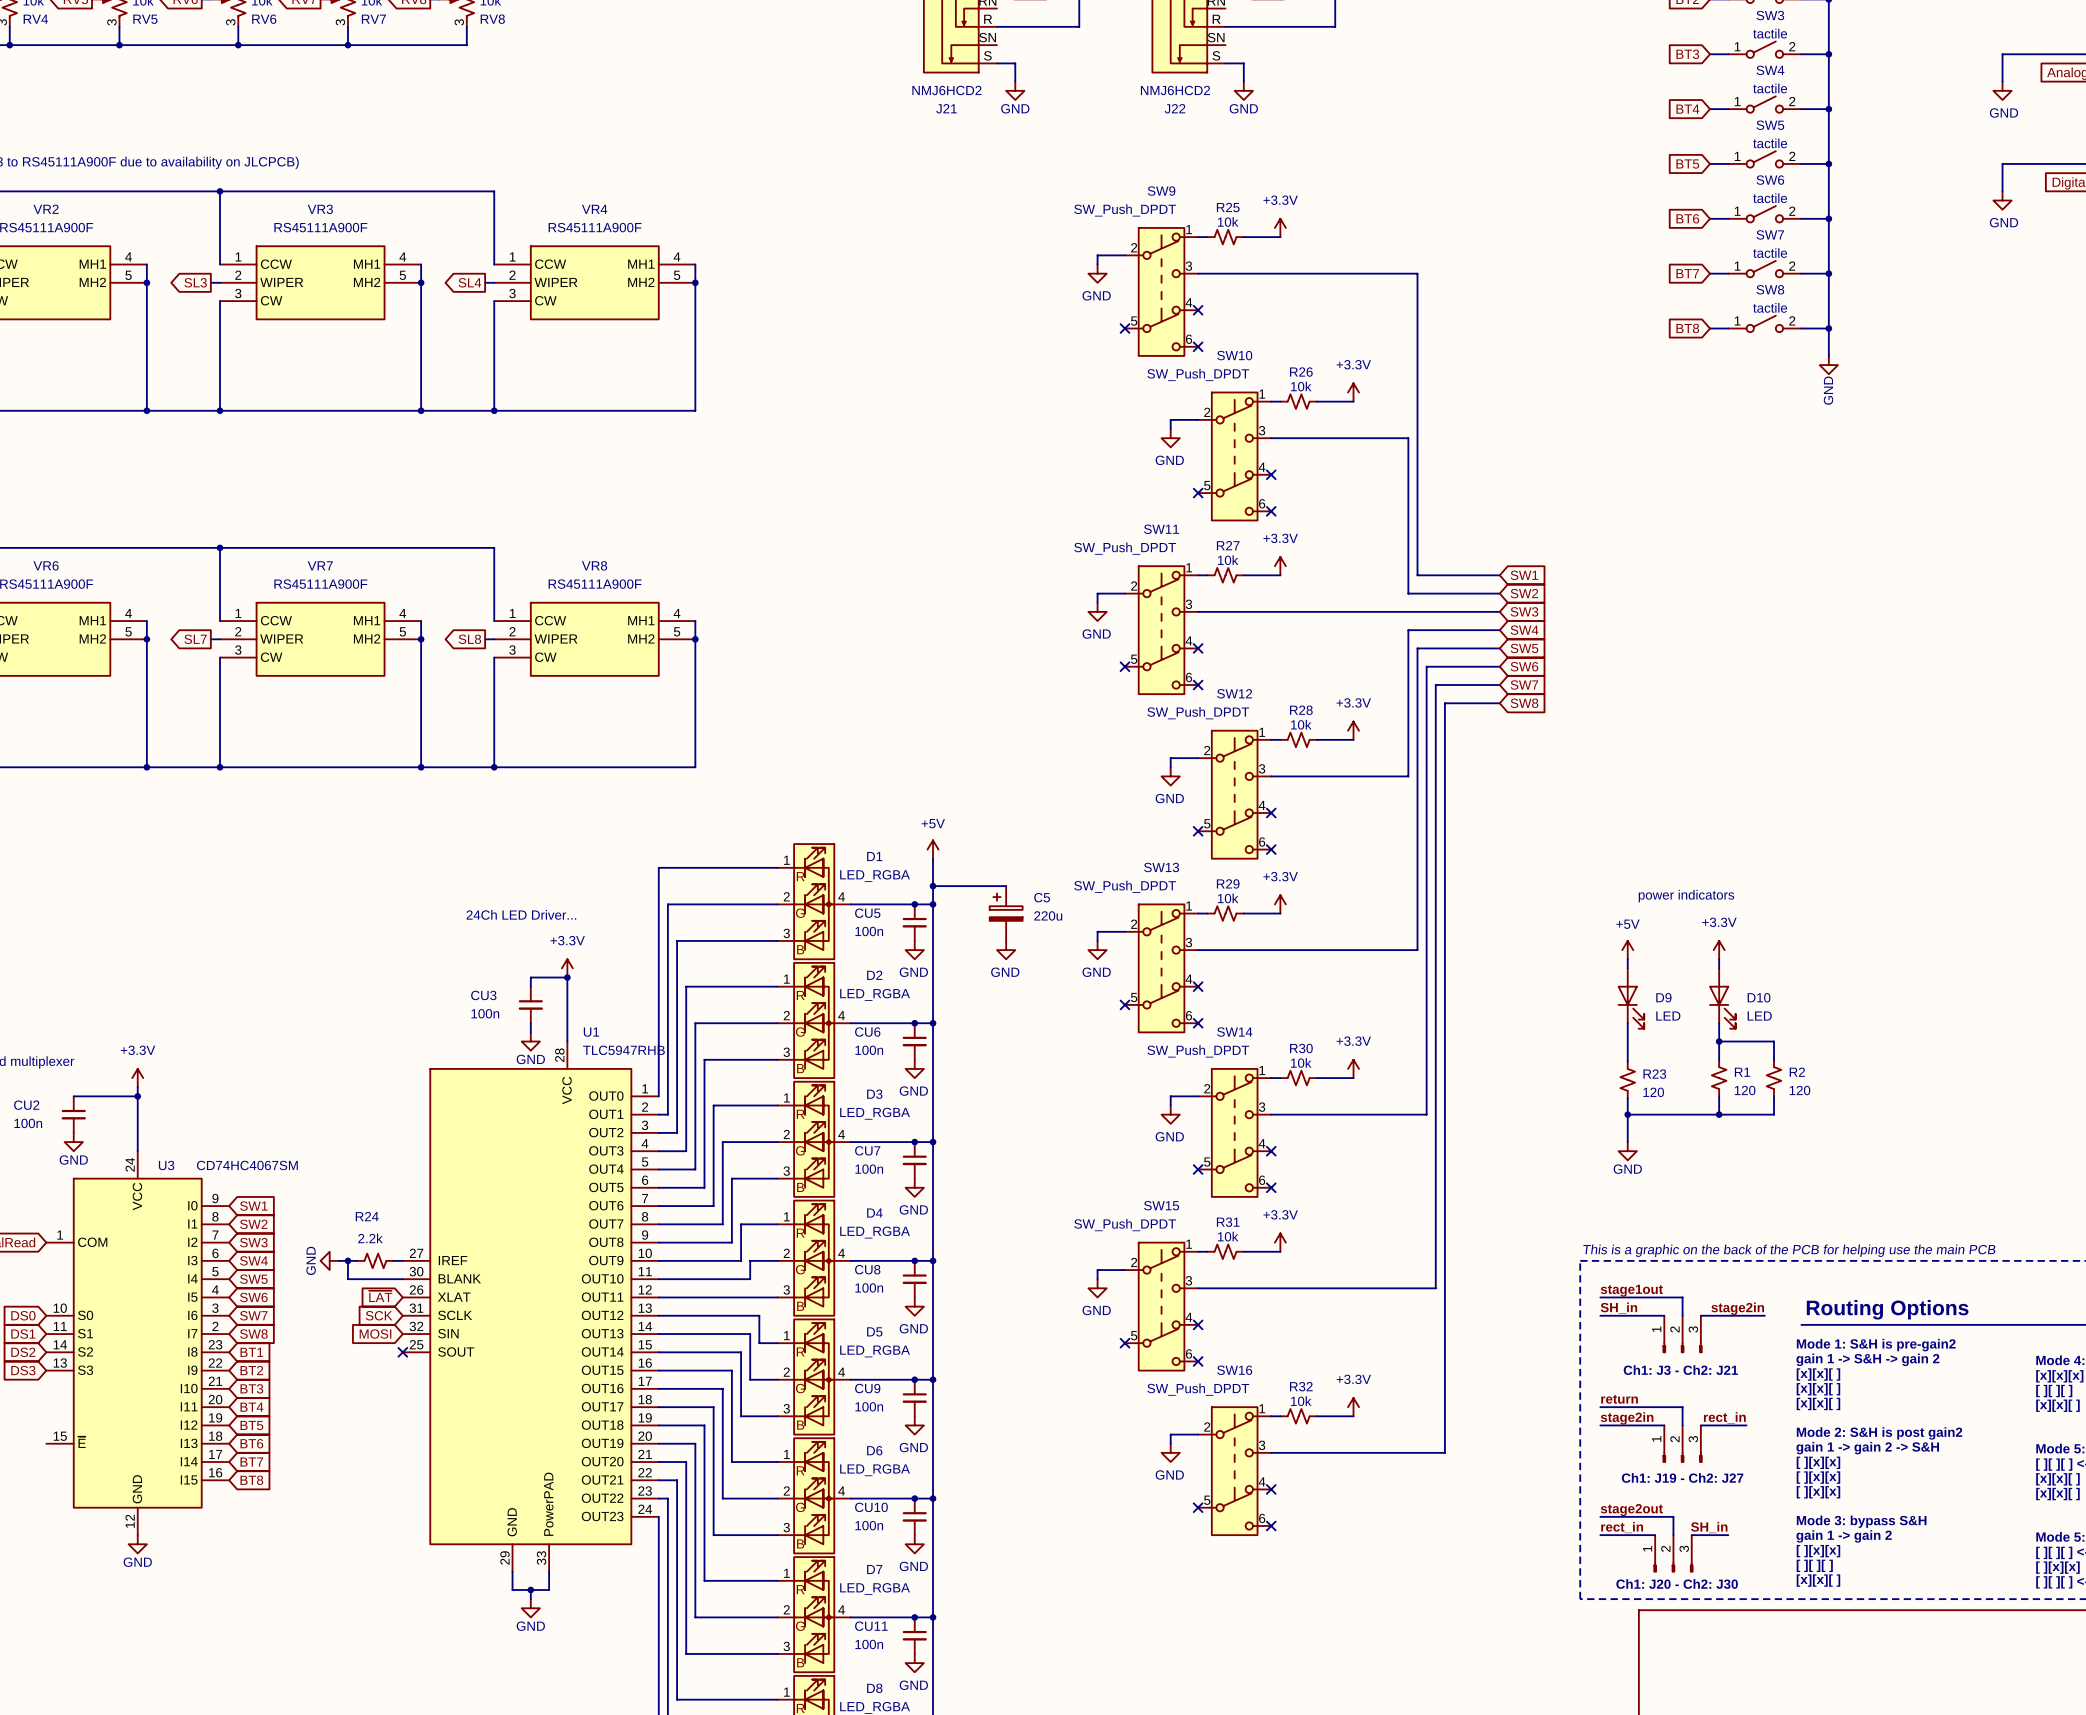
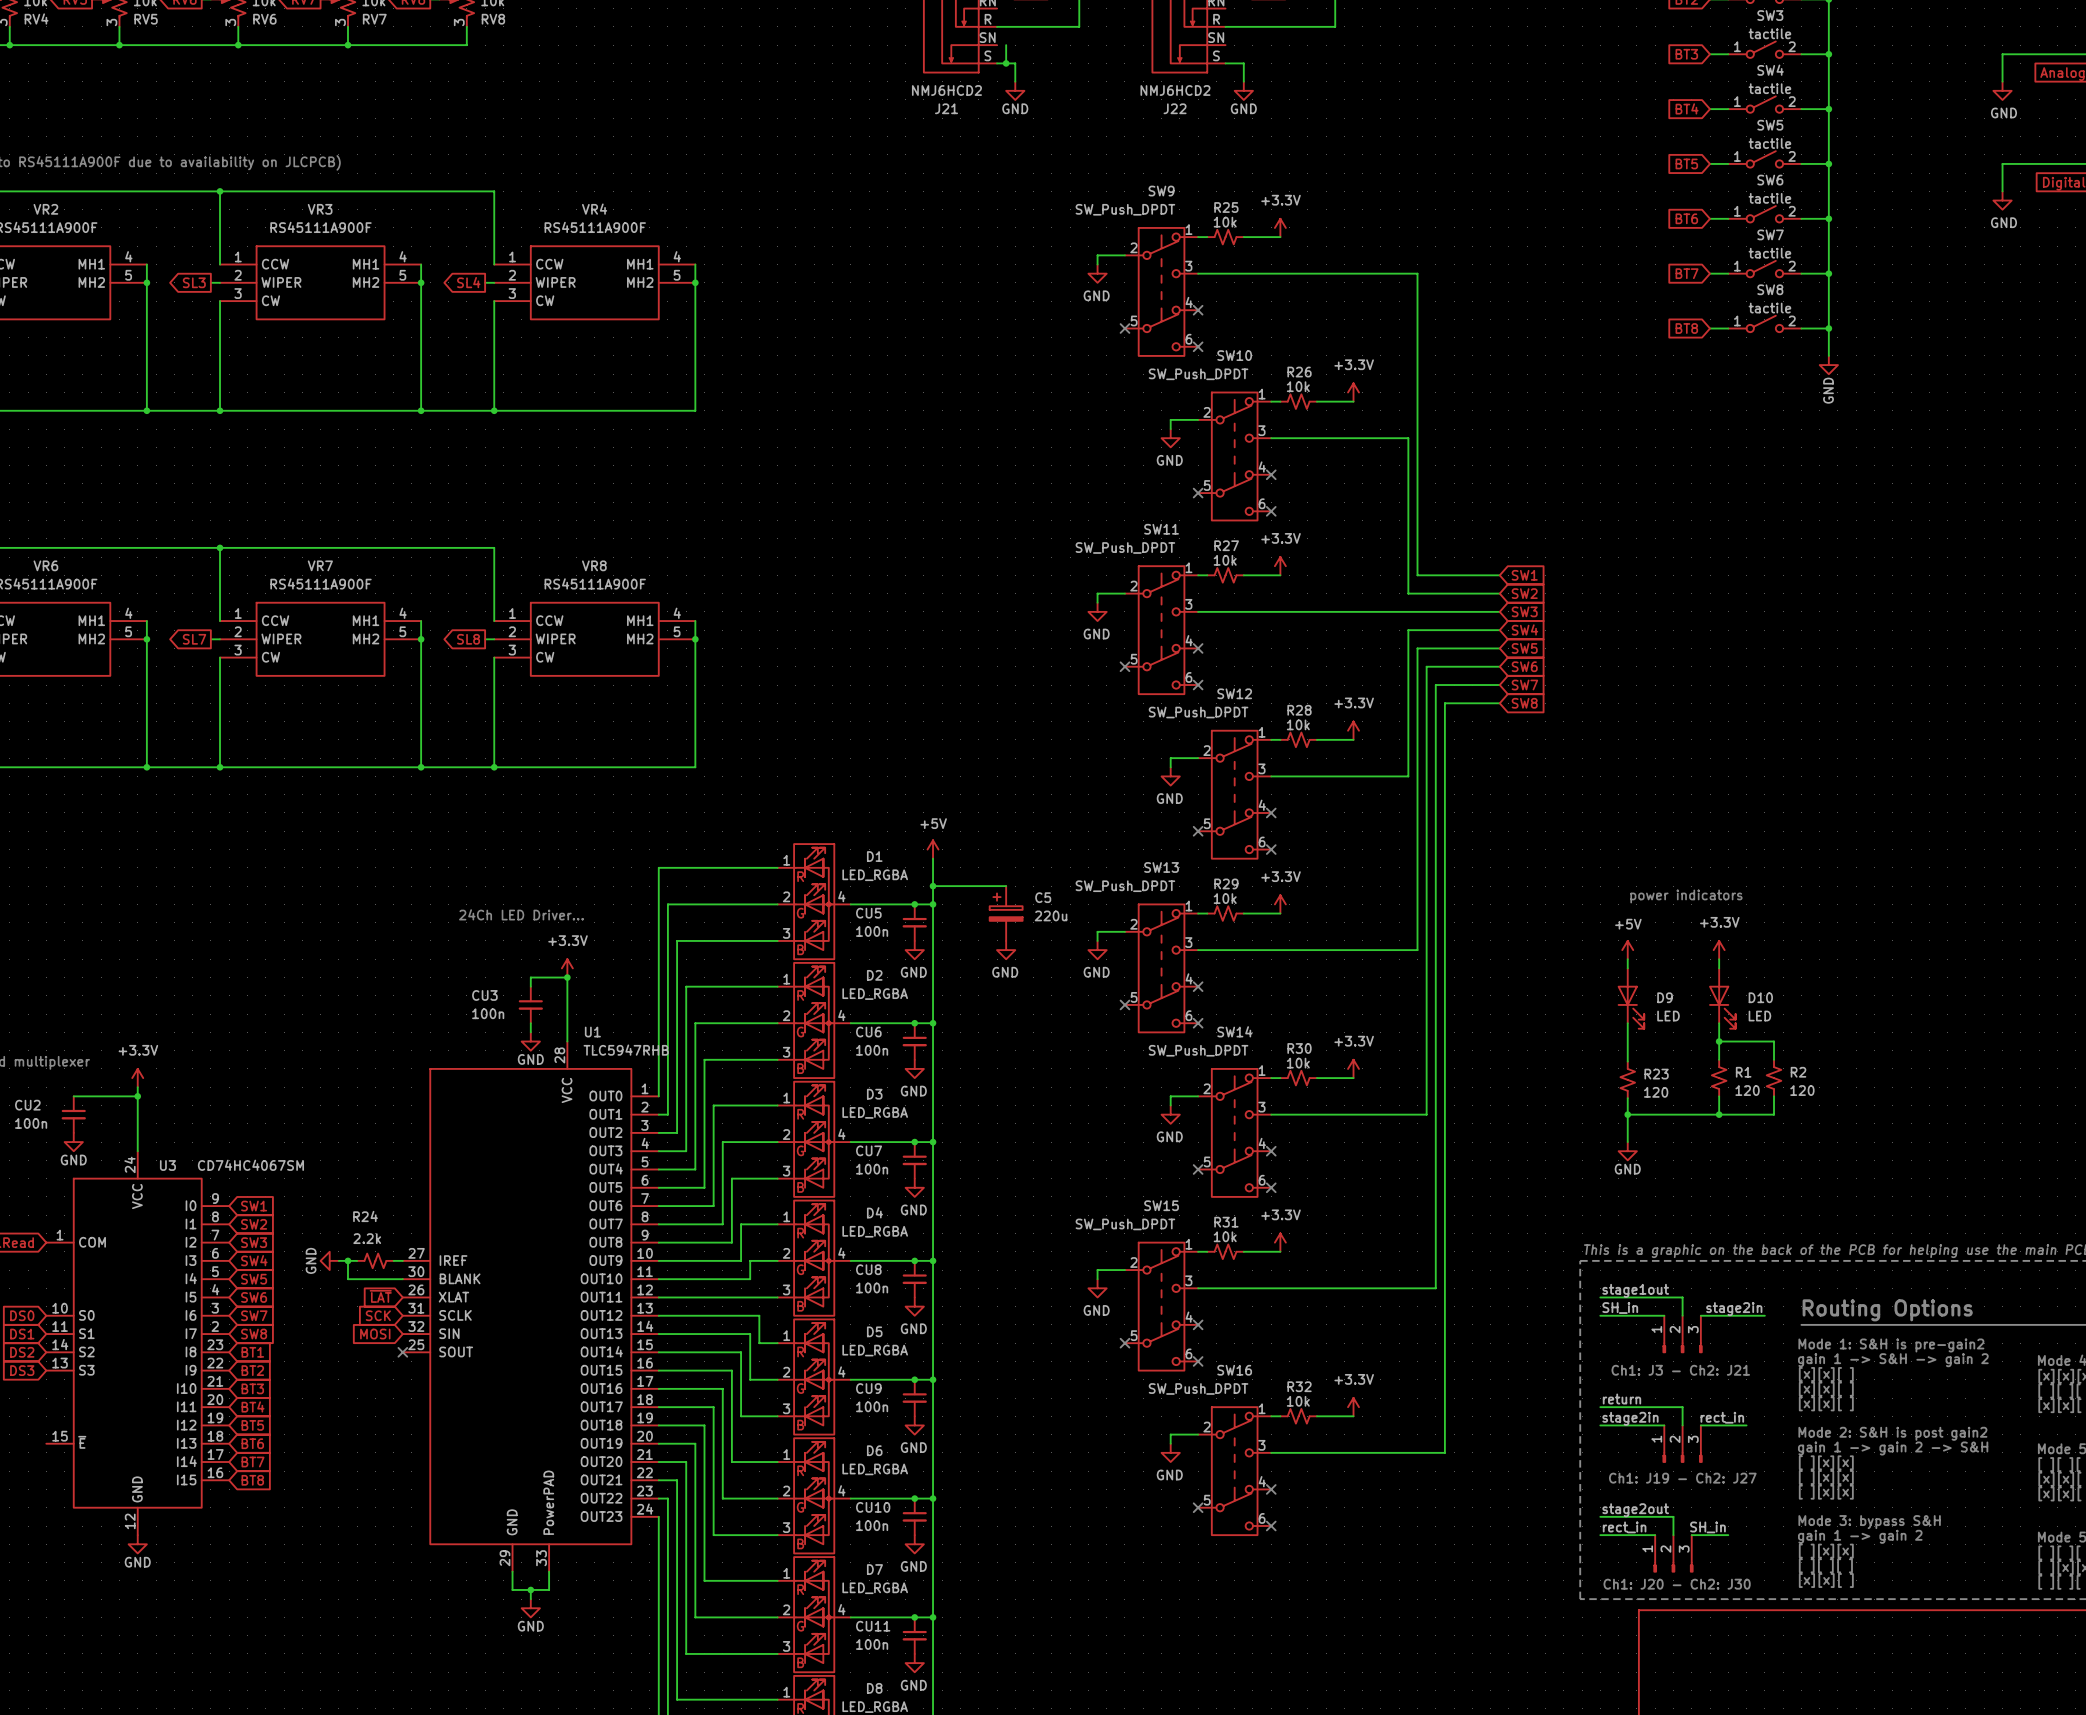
wire: none -> (1006, 45) (1006, 63)
junction: none -> (1006, 63)

